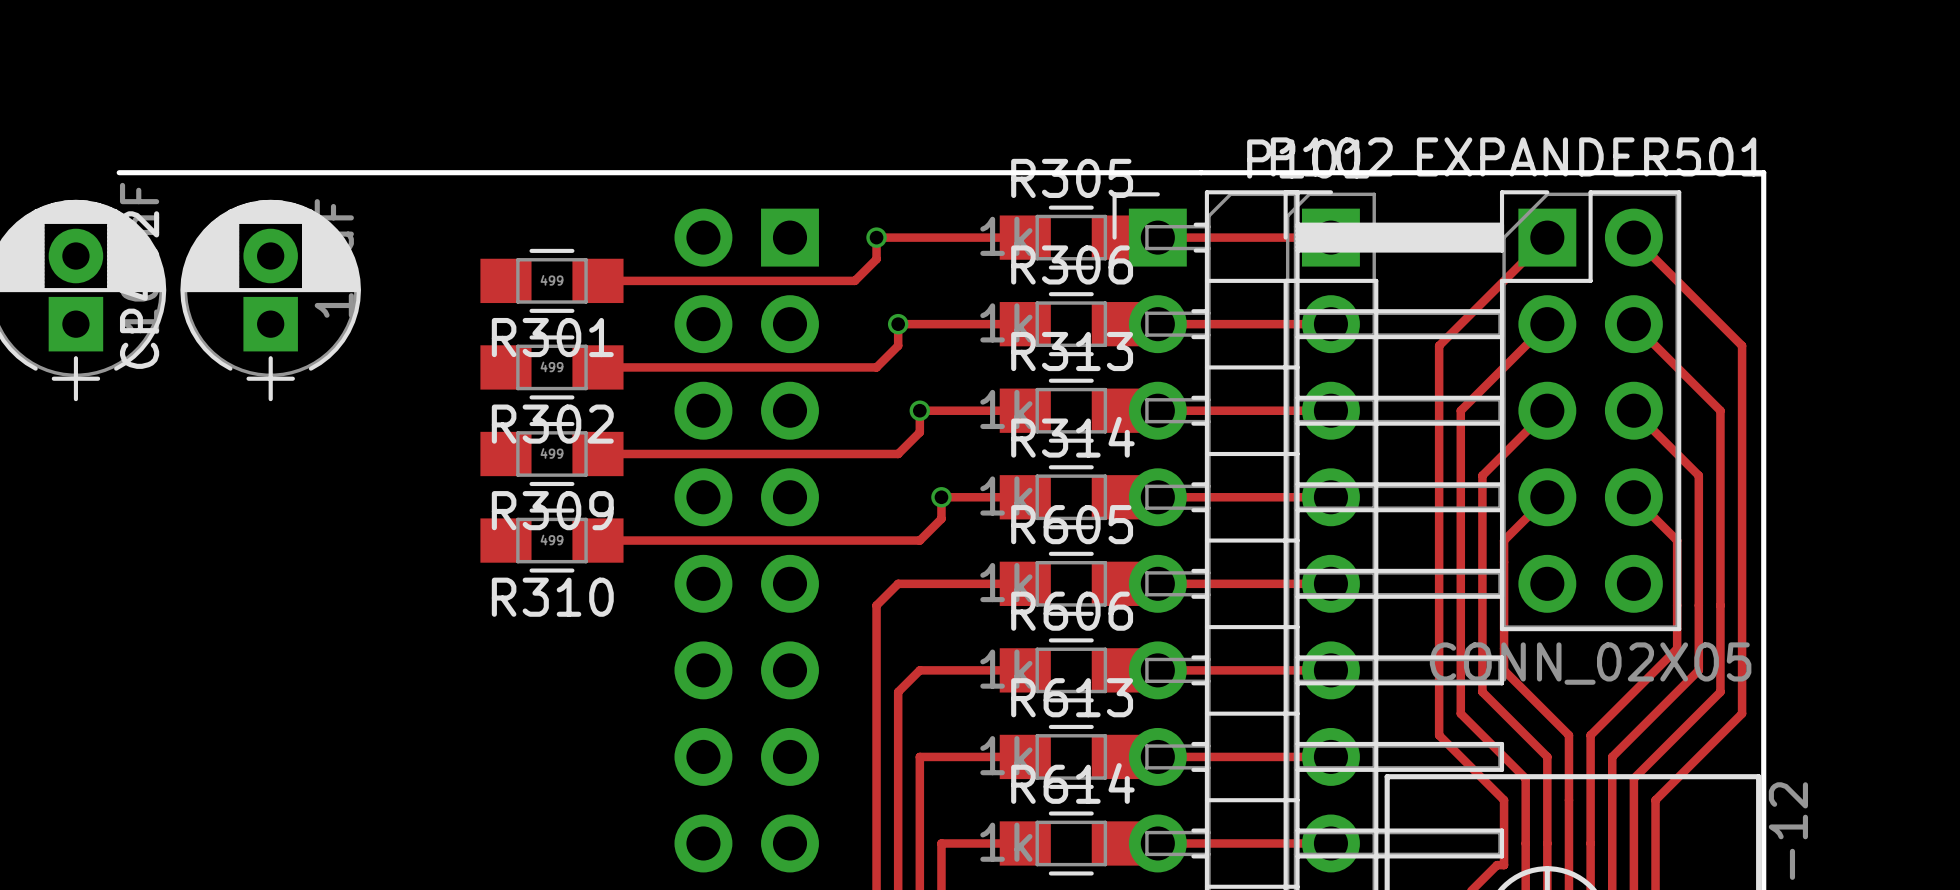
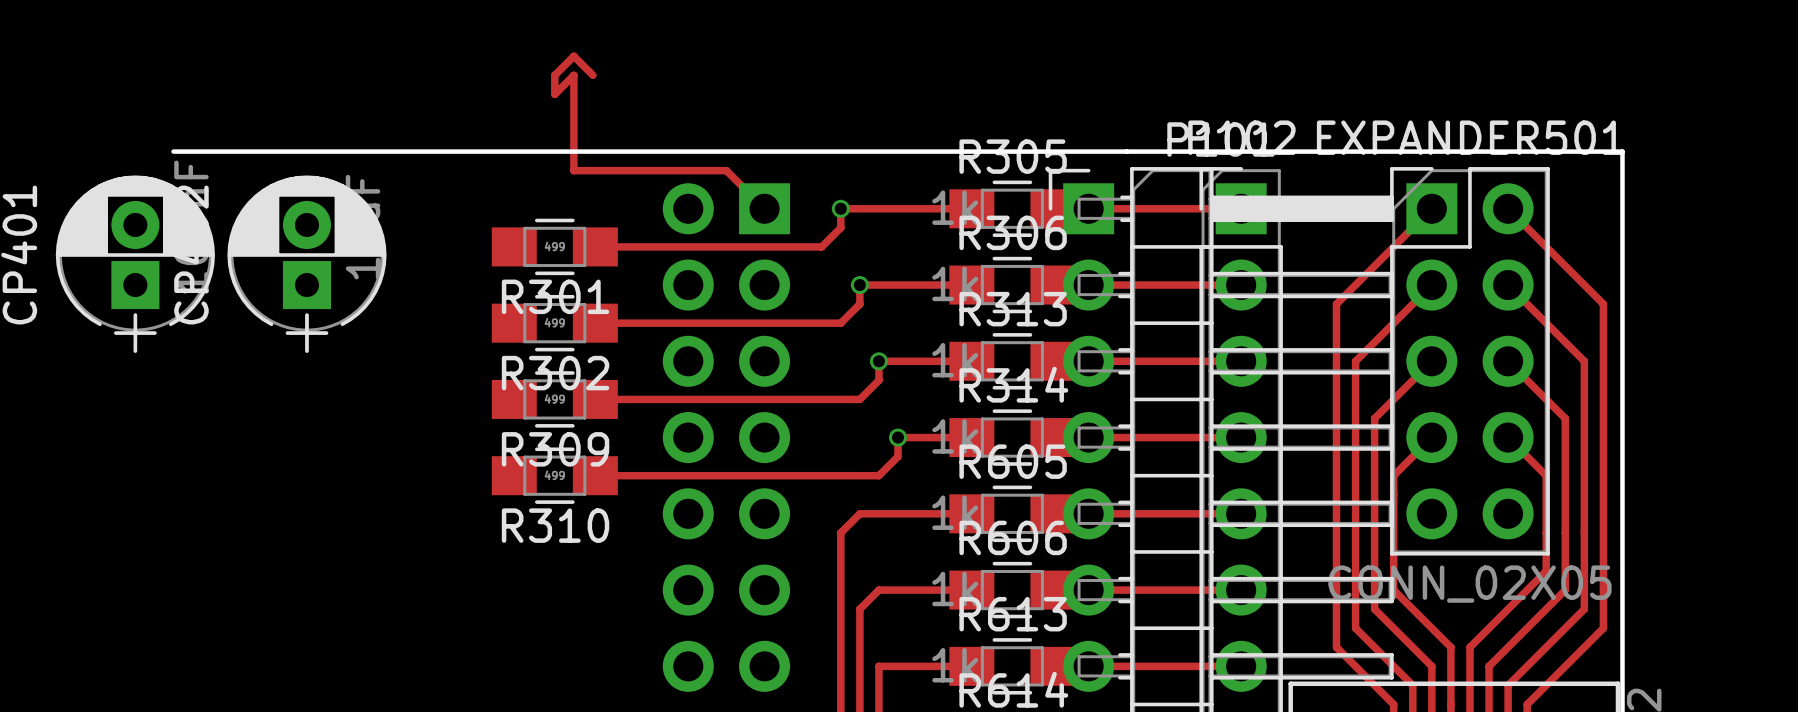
track: none -> (592, 75) (573, 56) (554, 75) (554, 94) (573, 75) (573, 170) (726, 170) (764, 208)

